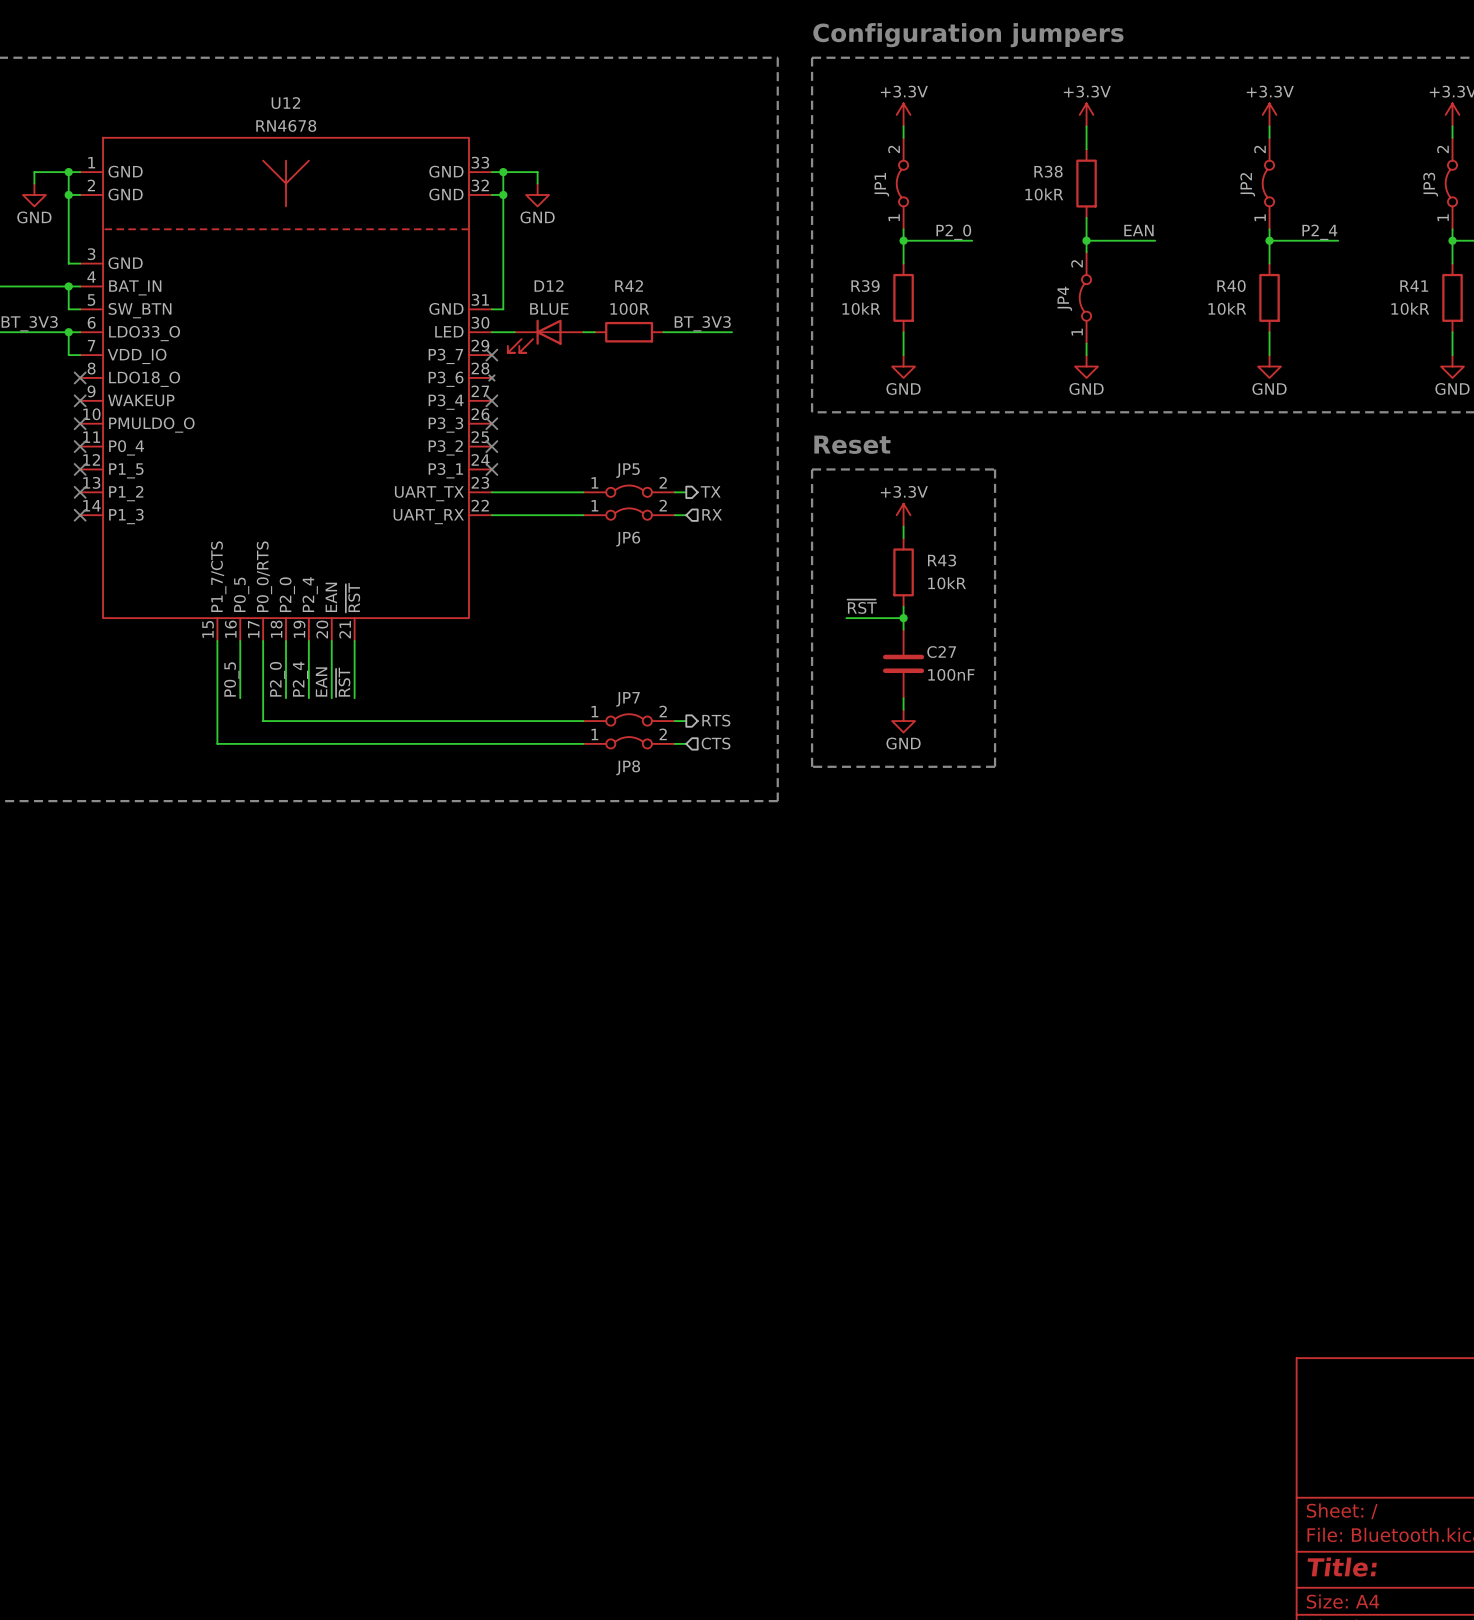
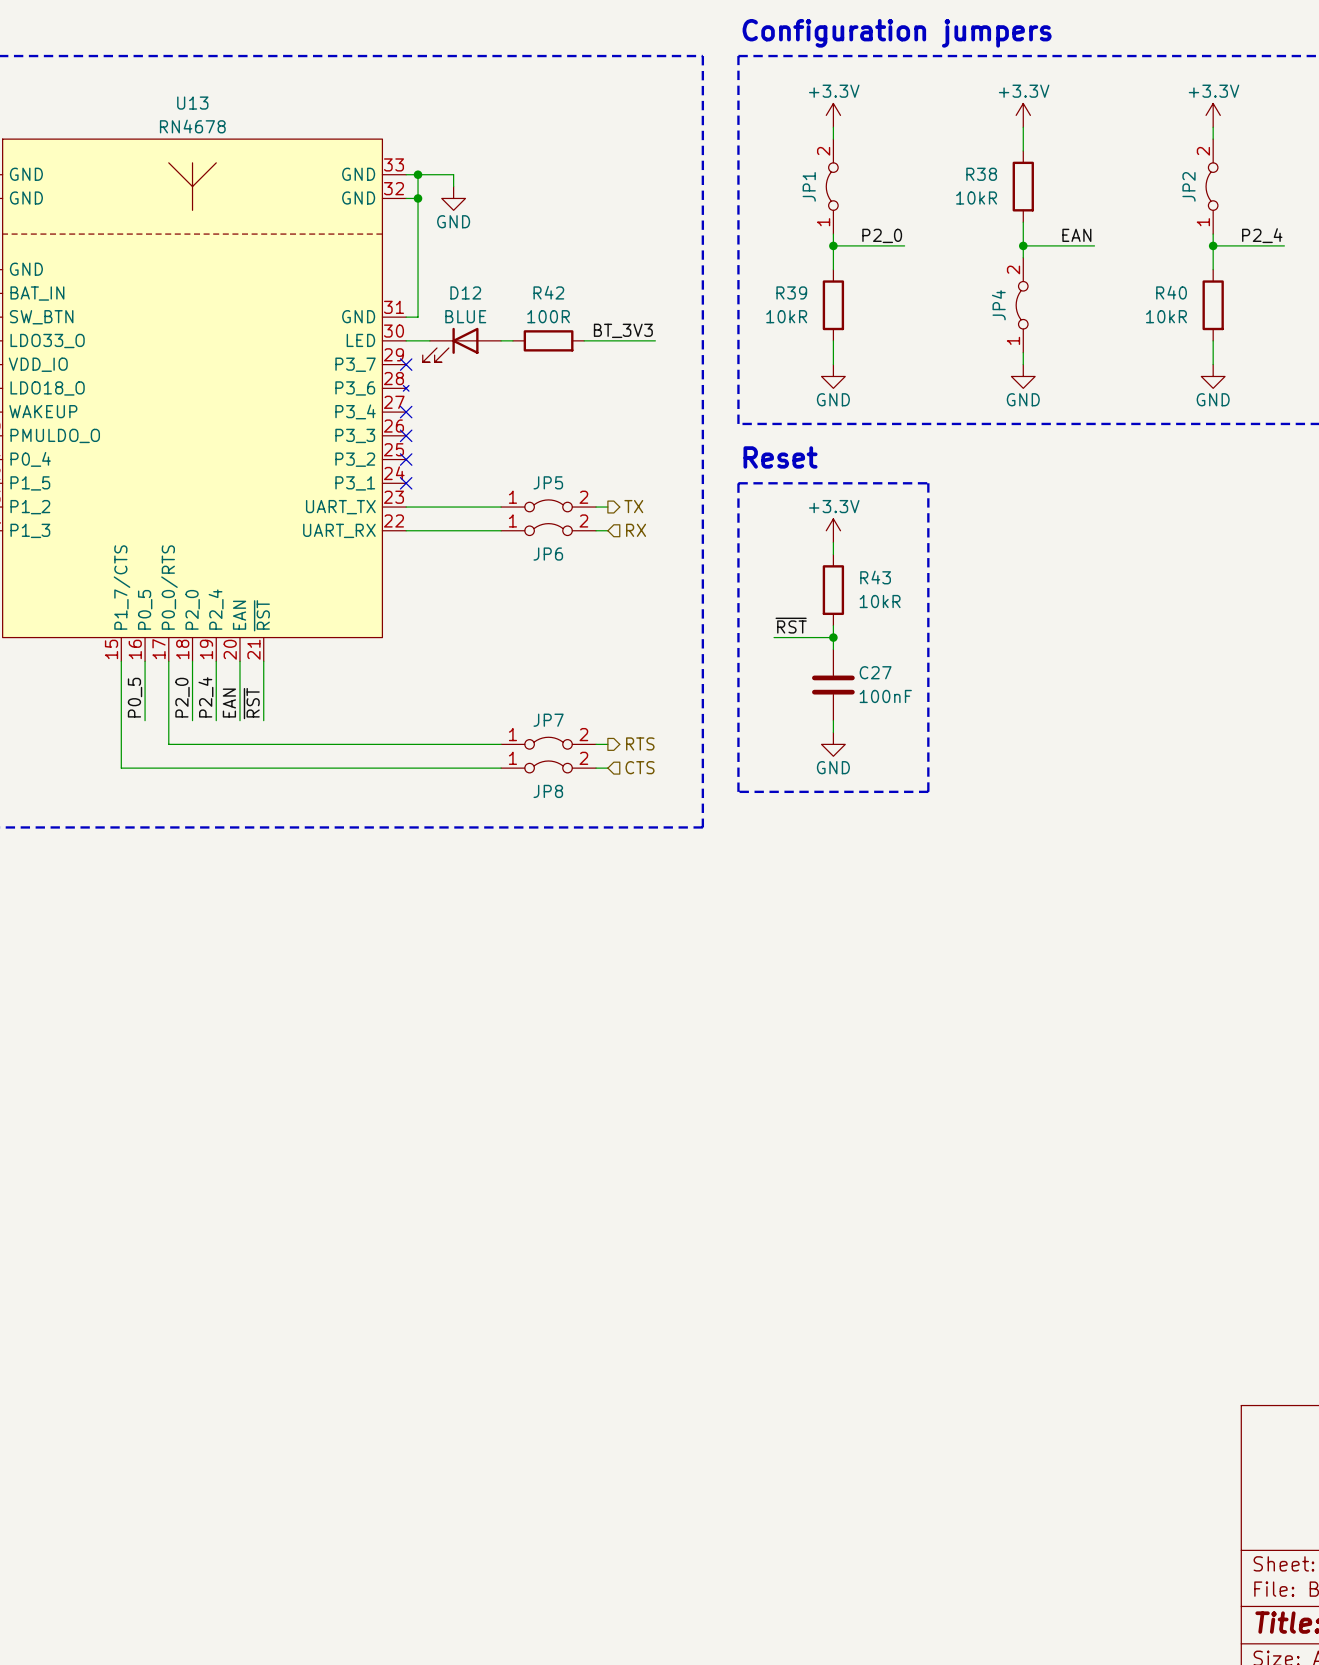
U12 name: U12 (285, 103) -> U13 (192, 103)

